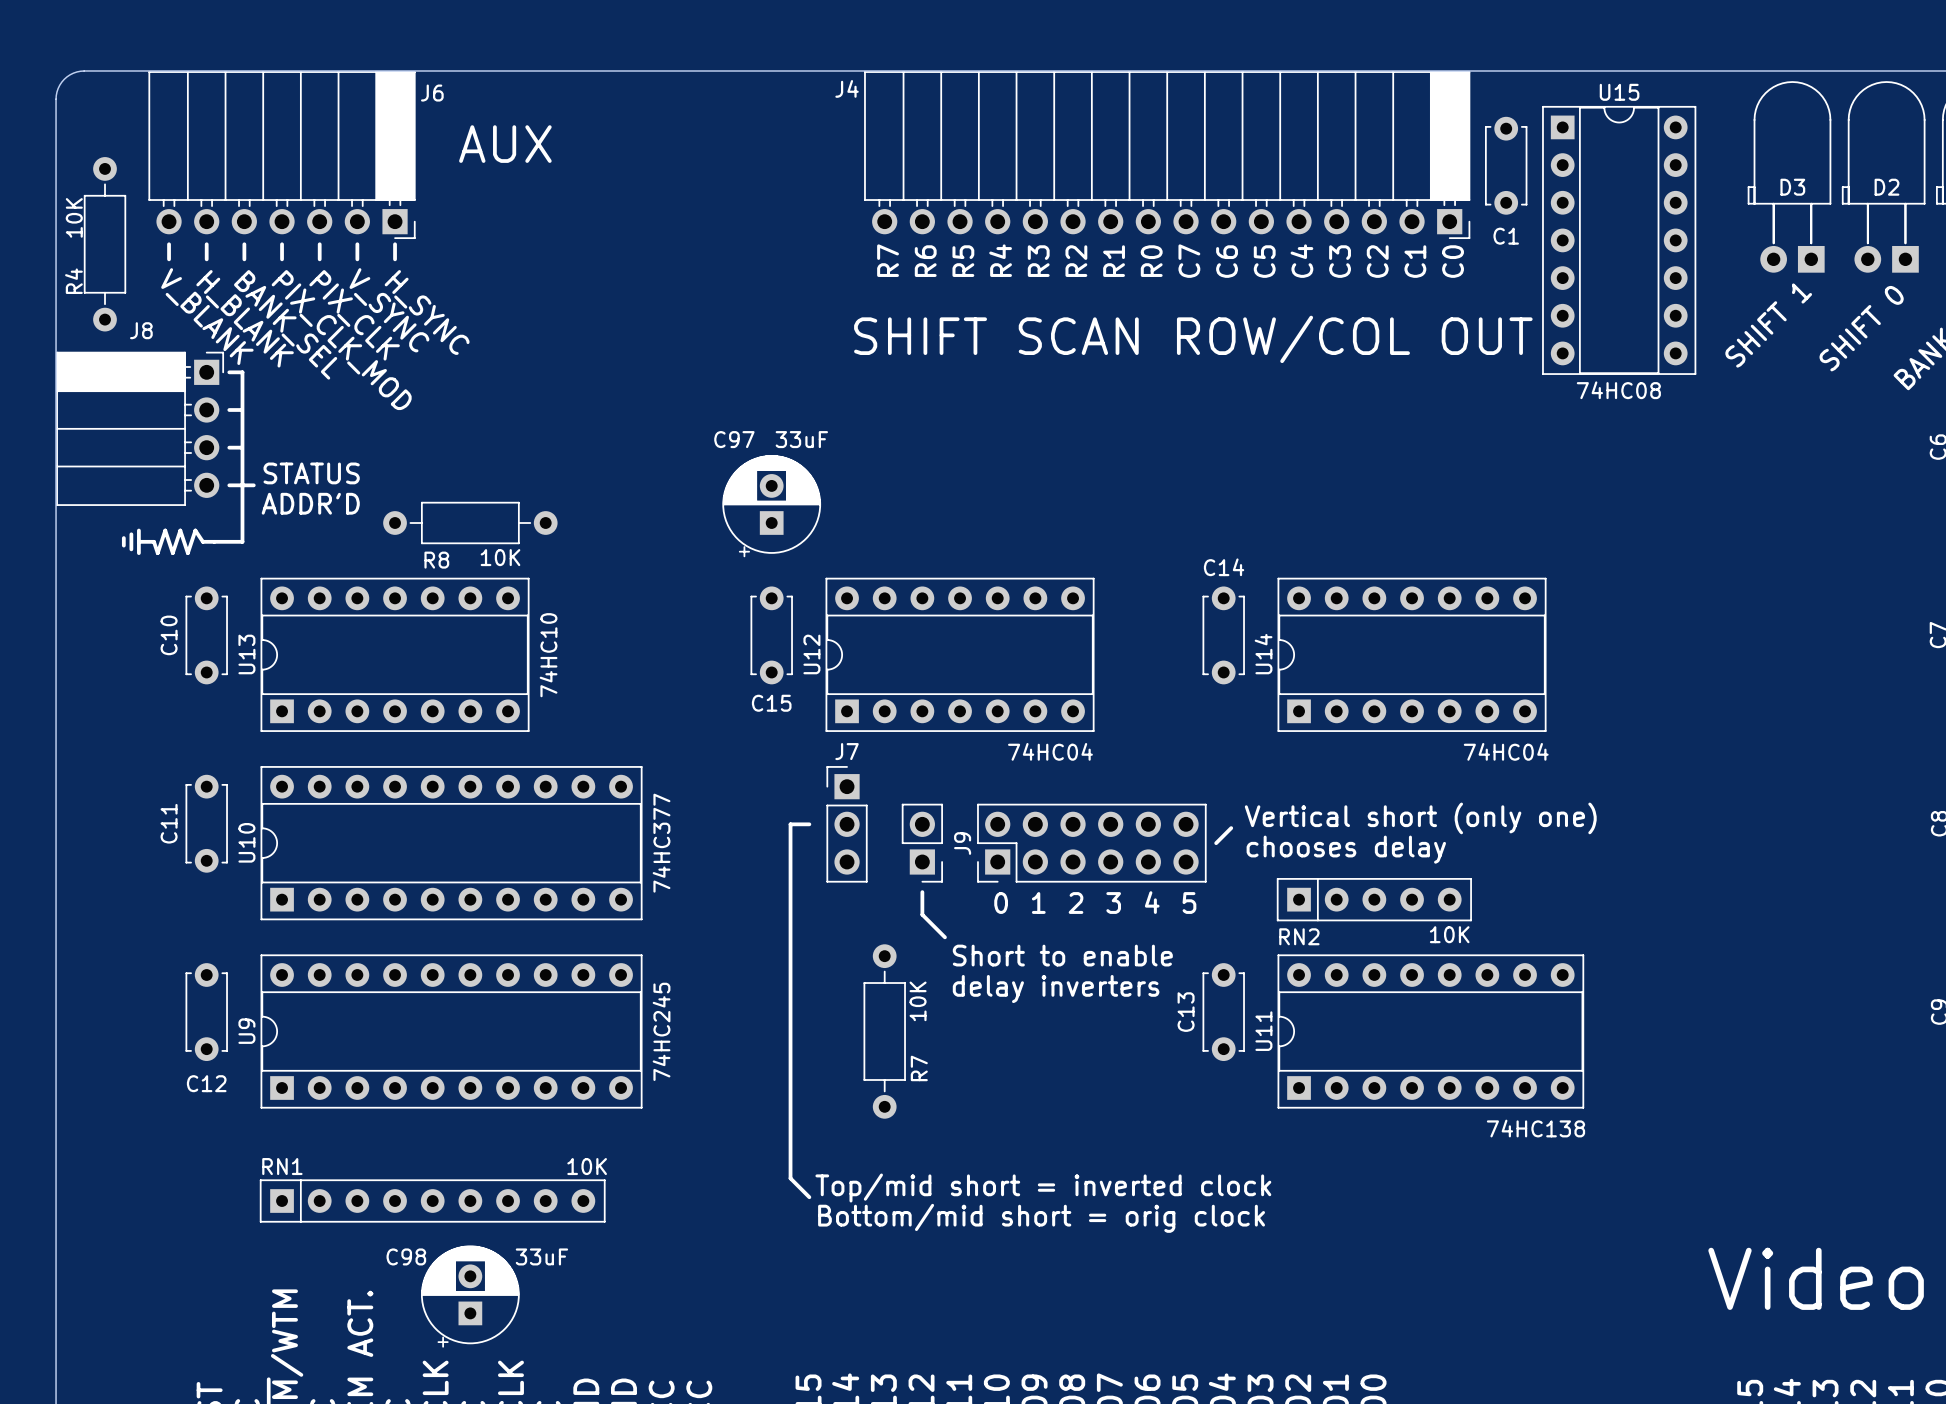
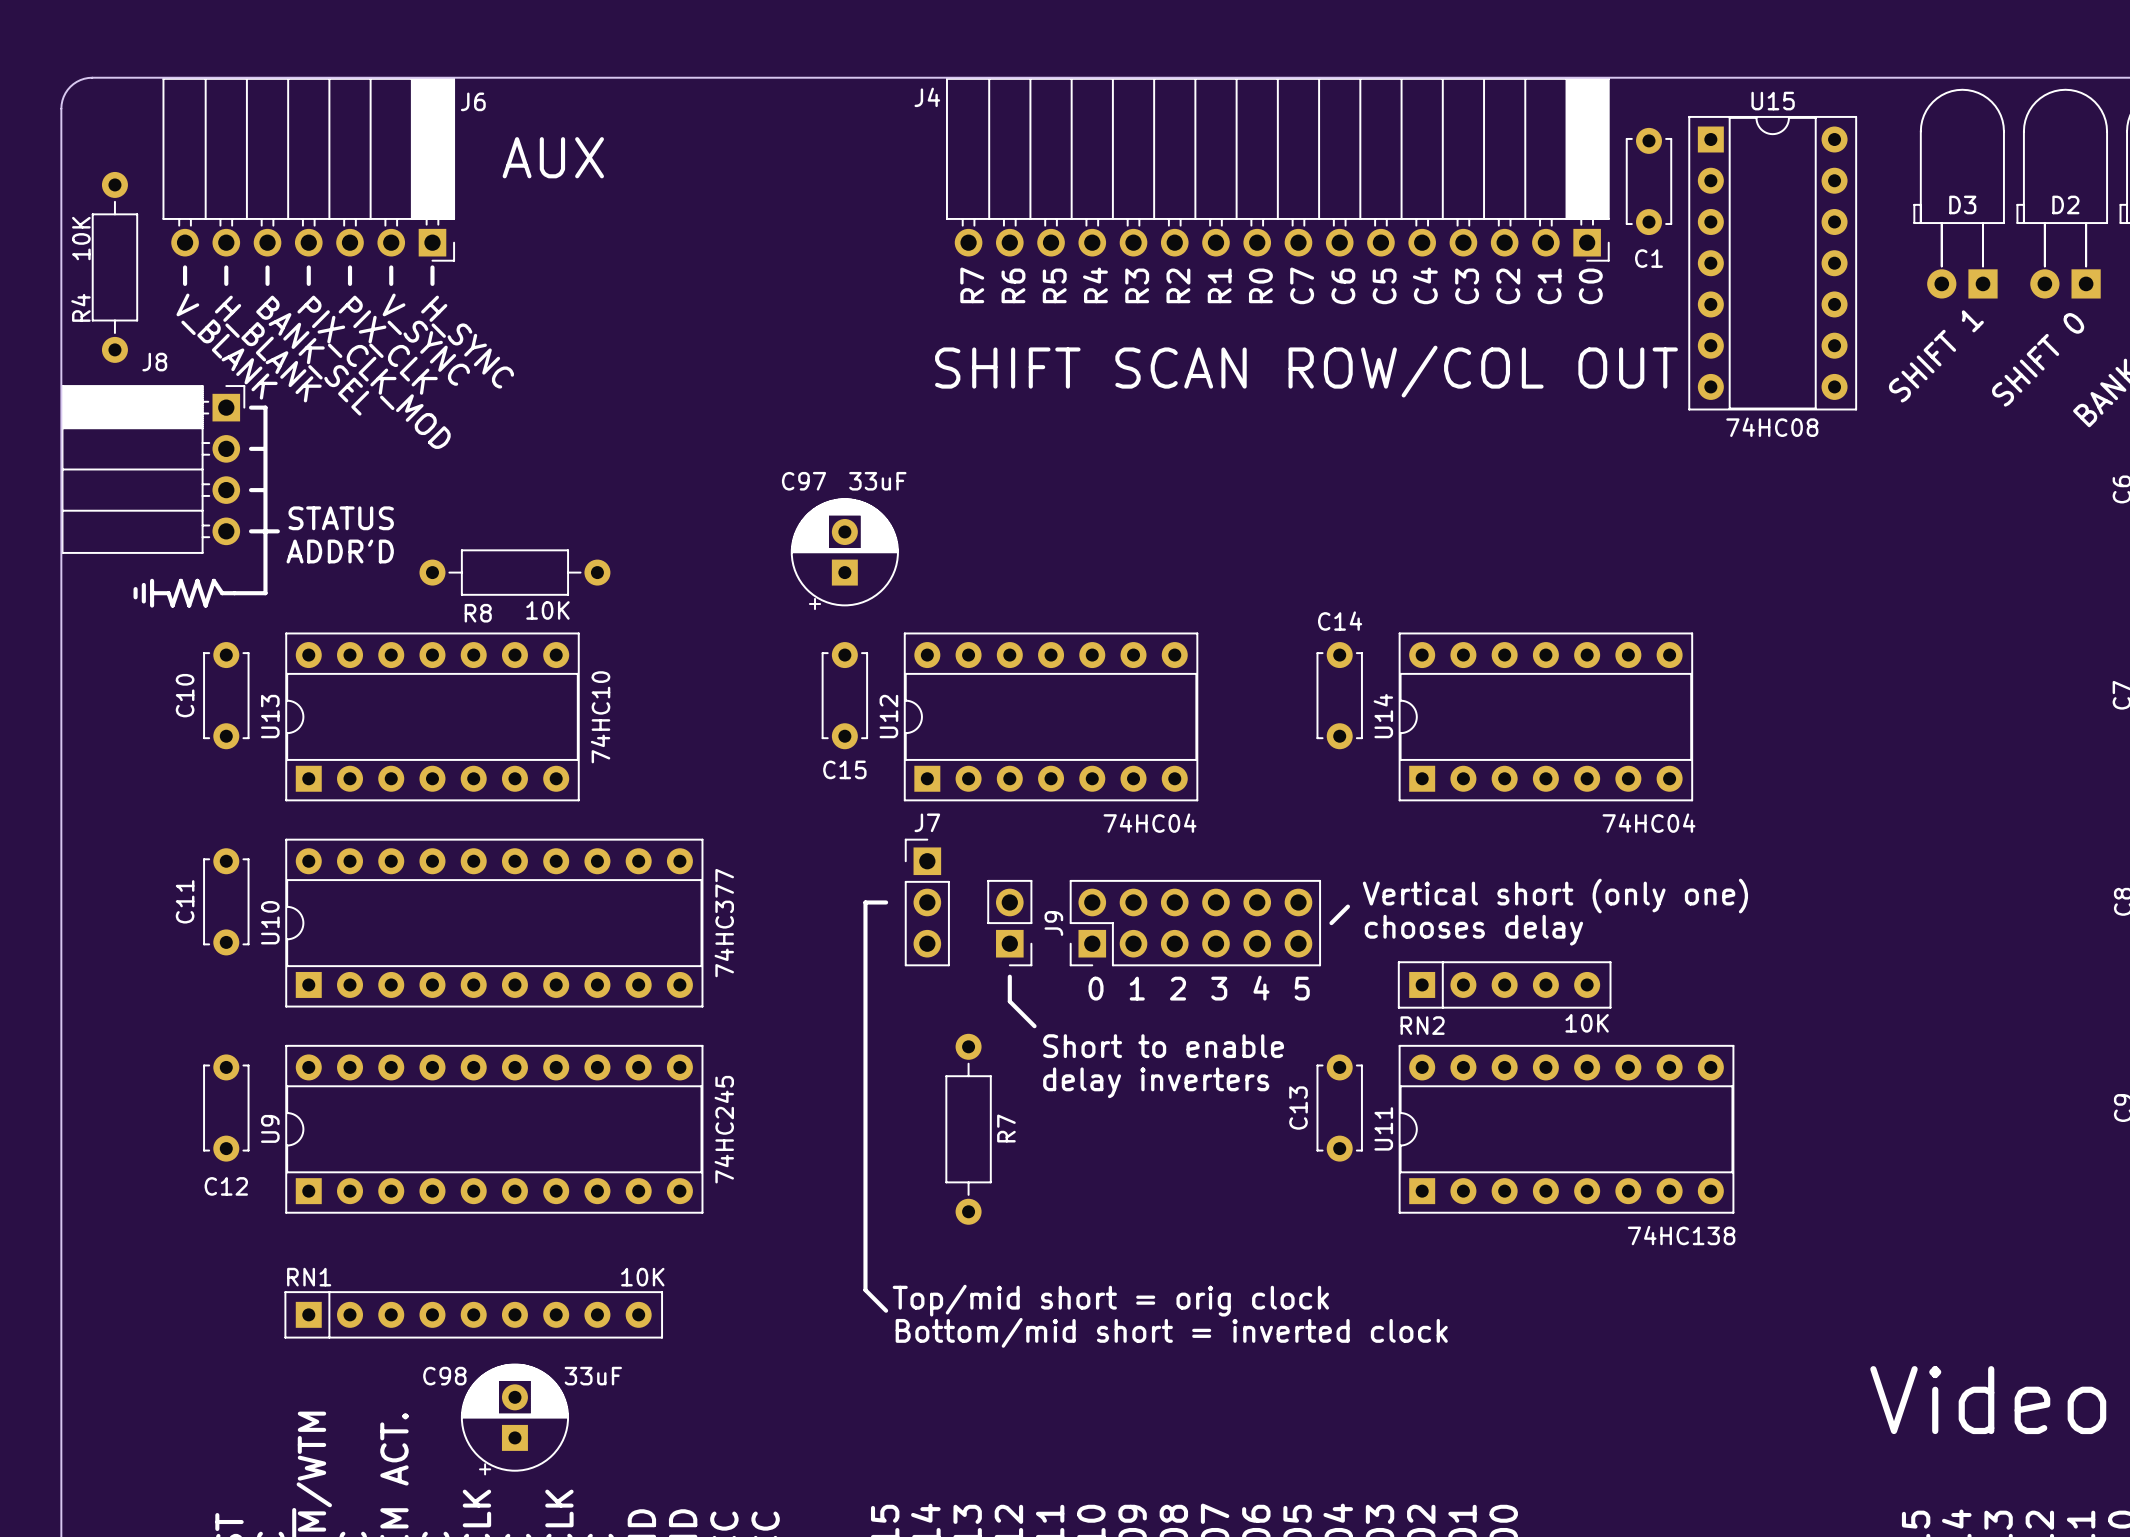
R7 value: 10K (918, 1001) -> none
R7 name position: R7 (919, 1068) -> R7 (1006, 1128)
text: Top/mid short = inverted clock (1043, 1188) -> Top/mid short = orig clock (1110, 1300)
text: Bottom/mid short = orig clock (1041, 1218) -> Bottom/mid short = inverted clock (1171, 1332)

